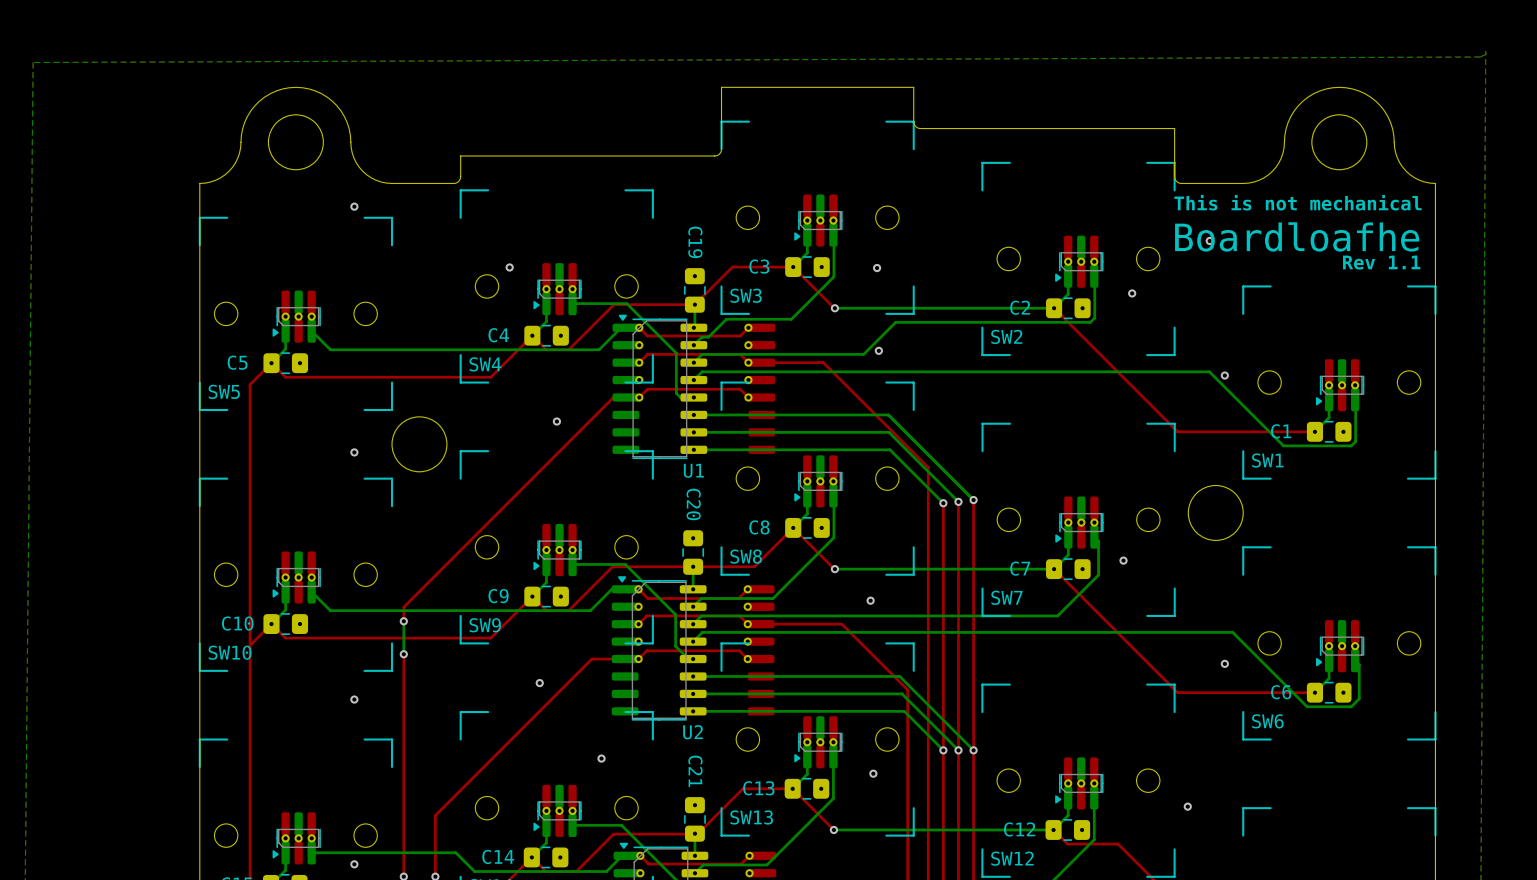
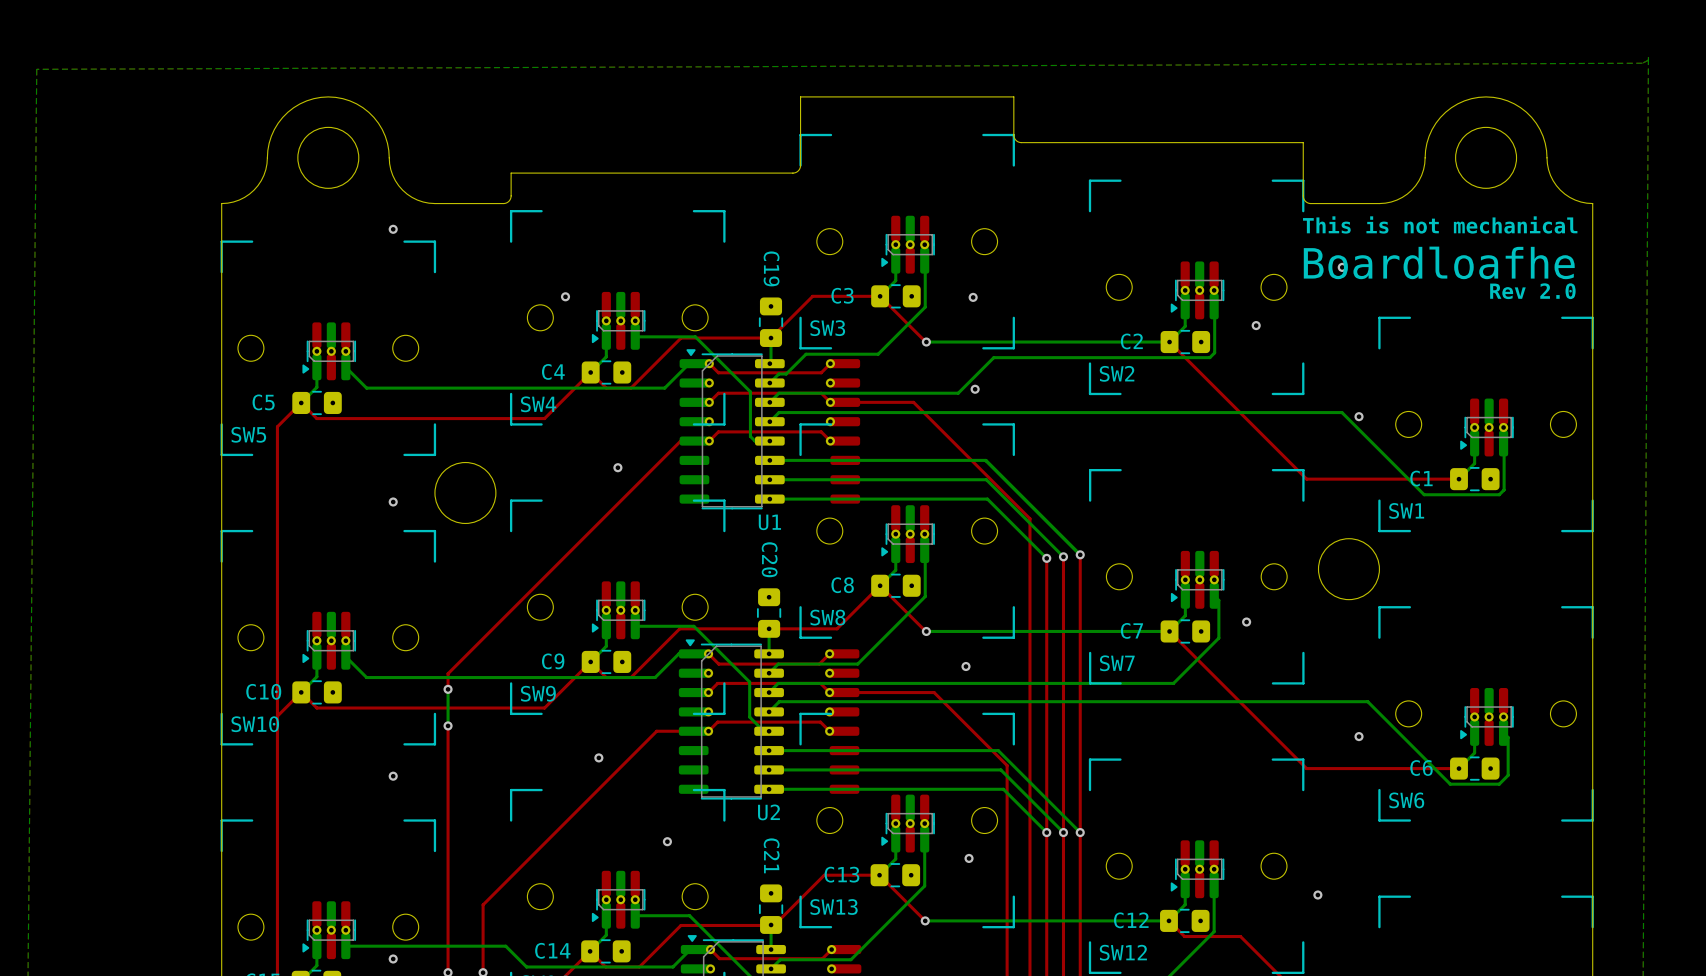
text: Rev 1.1 (1381, 262) -> Rev 2.0 (1532, 291)

